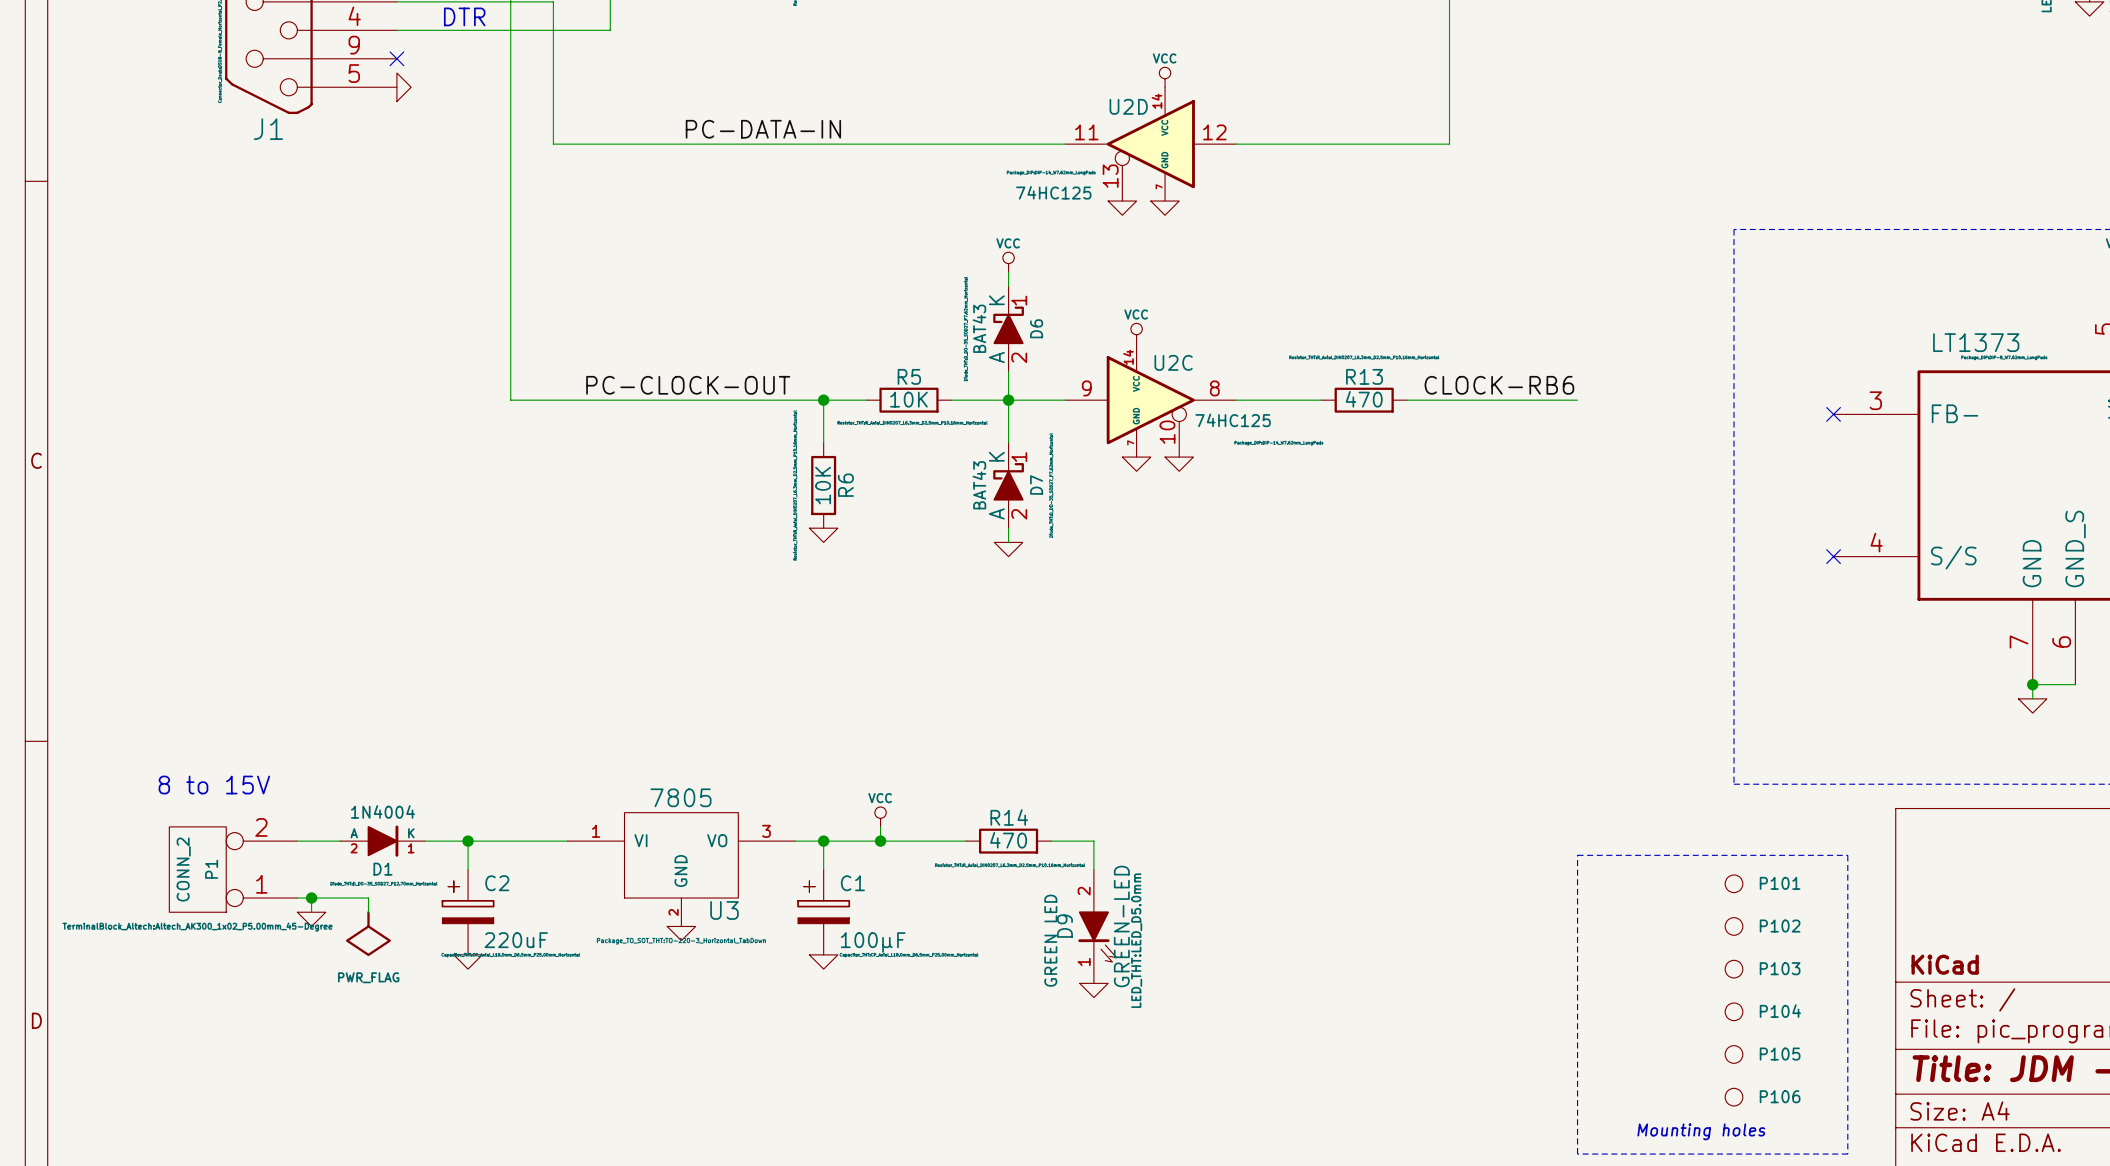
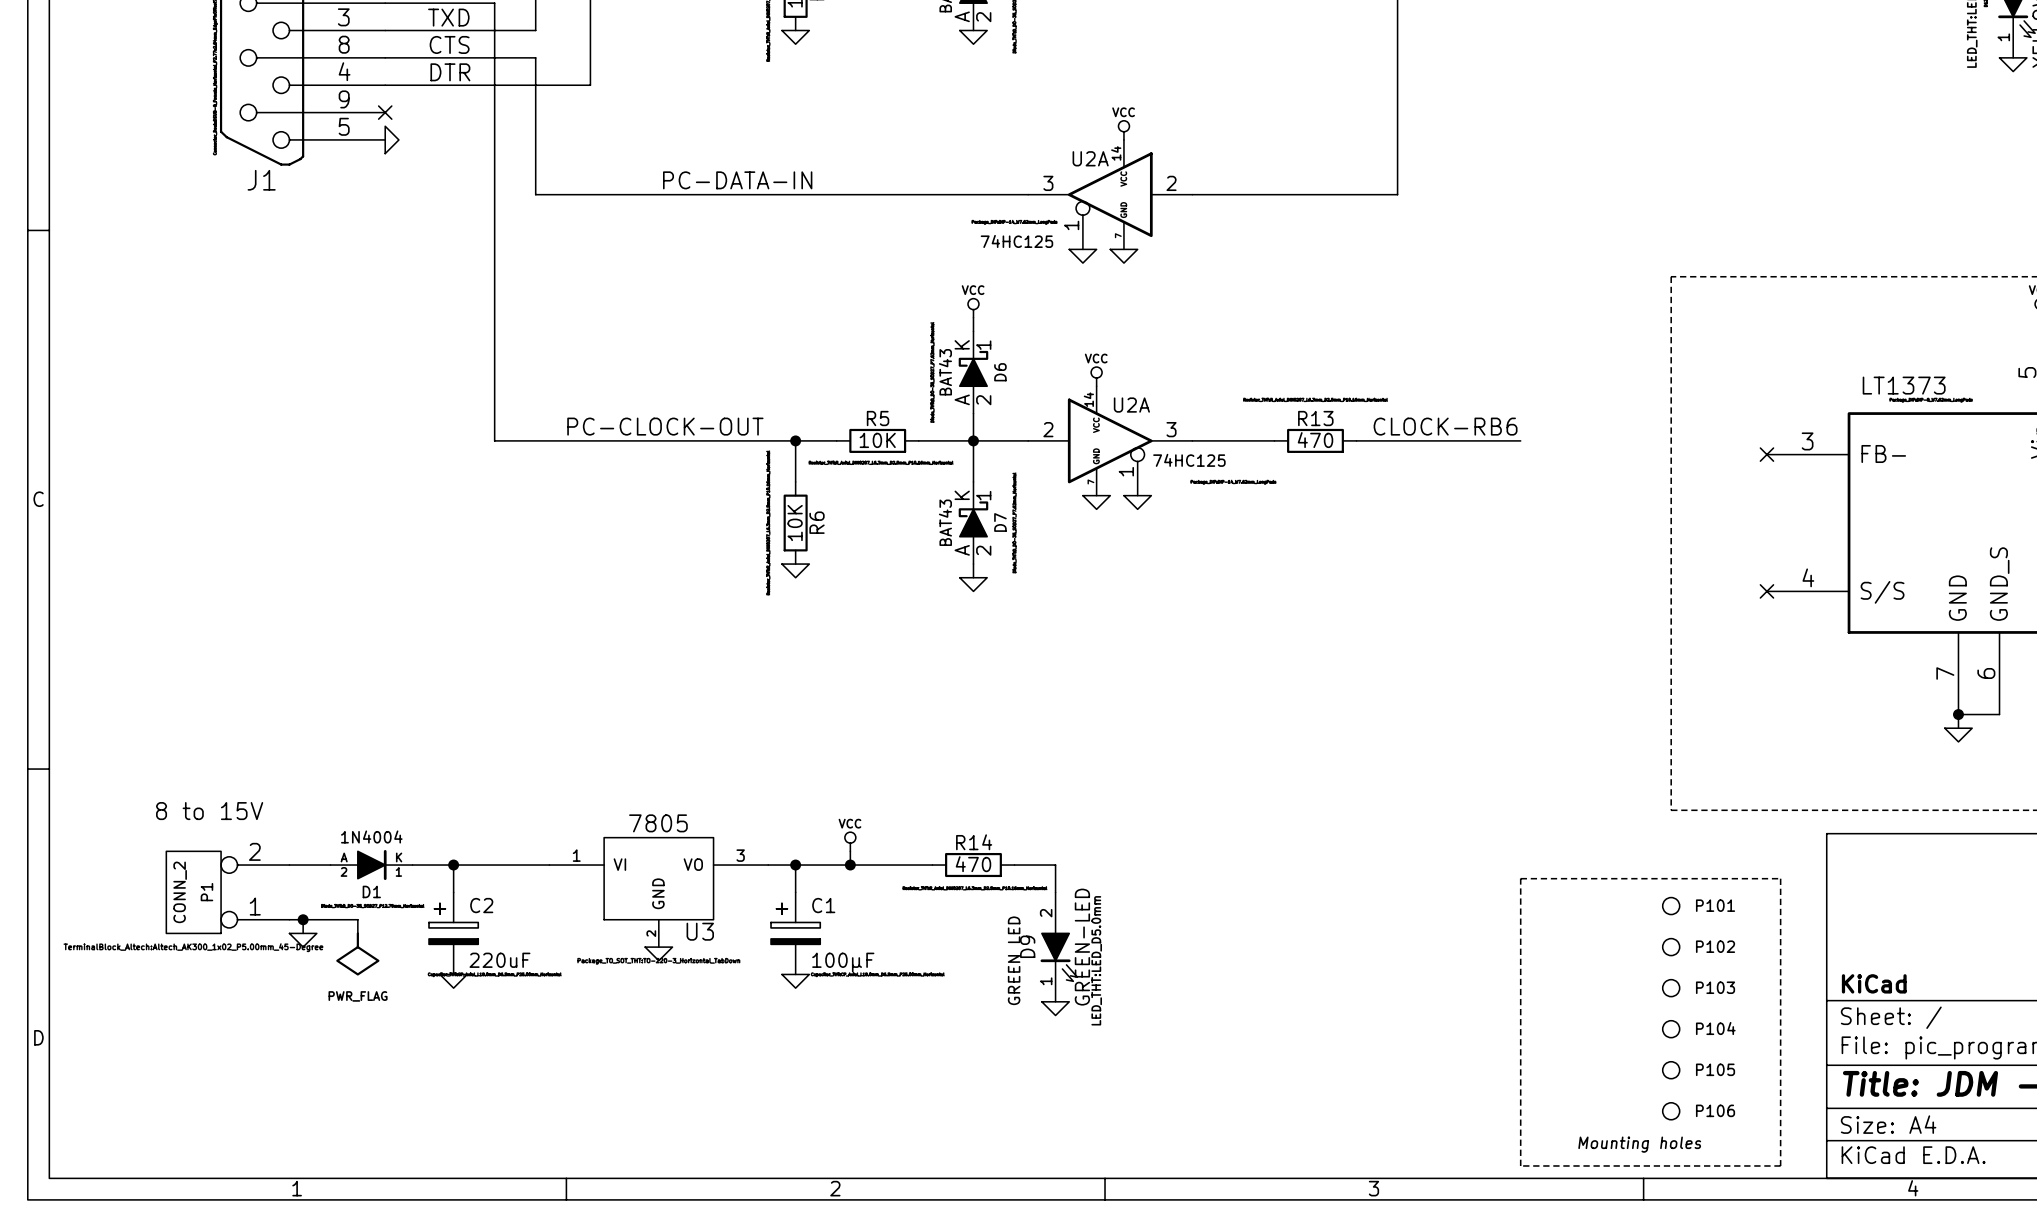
U2D name: U2D (1128, 106) -> U2A (1090, 158)
U2D pin number: 11 (1086, 132) -> 3 (1048, 183)
U2D pin number: 12 (1214, 132) -> 2 (1171, 183)
U2D pin number: 13 (1110, 176) -> 1 (1071, 225)
U2C name: U2C (1173, 362) -> U2A (1131, 405)
U2C pin number: 9 (1086, 388) -> 2 (1048, 429)
U2C pin number: 8 (1214, 388) -> 3 (1171, 429)
U2C pin number: 10 (1167, 432) -> 1 (1126, 471)

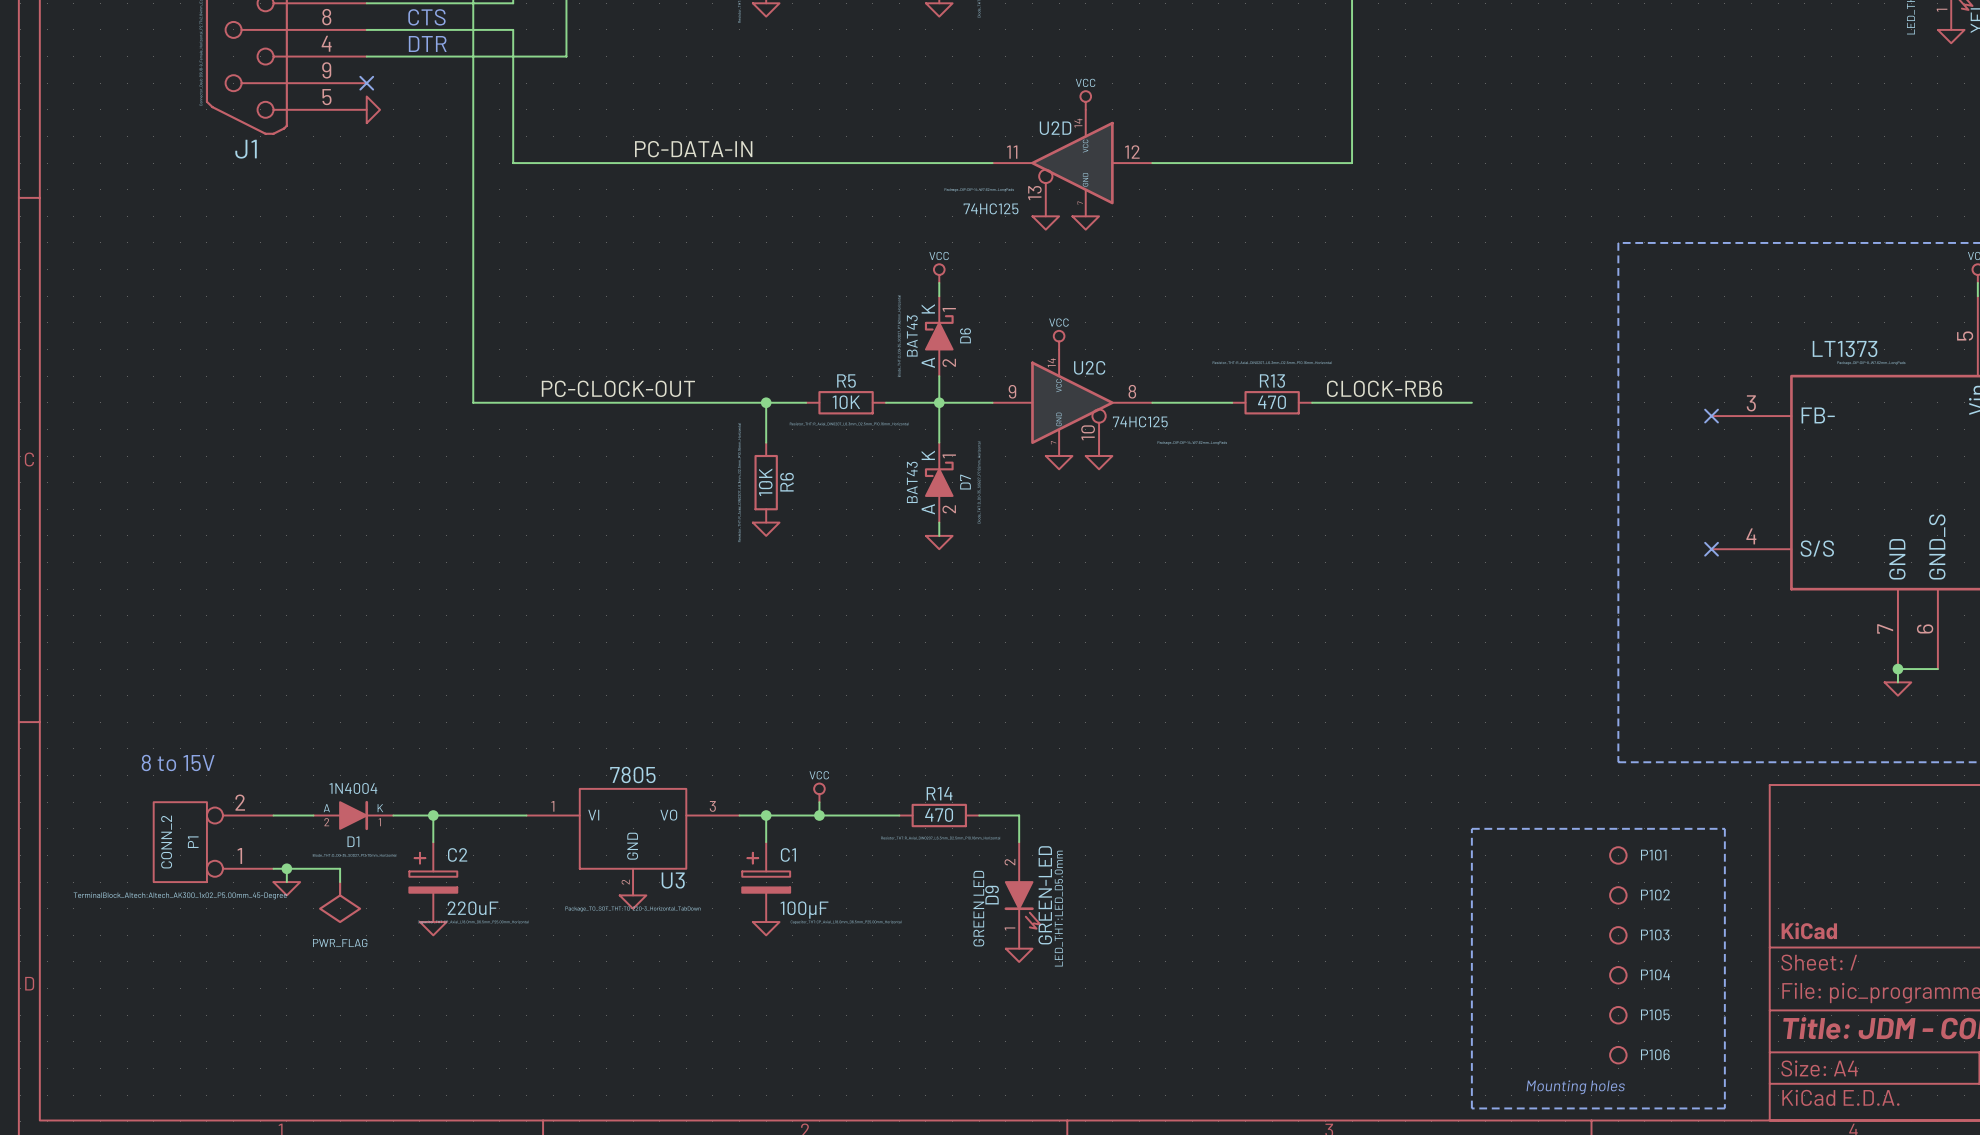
U2A name: U2A (1090, 158) -> U2D (1055, 128)
U2A pin number: 3 (1048, 183) -> 11 (1012, 152)
U2A pin number: 2 (1171, 183) -> 12 (1132, 152)
U2A pin number: 1 (1071, 225) -> 13 (1034, 193)
U2A name: U2A (1131, 405) -> U2C (1089, 367)
U2A pin number: 2 (1048, 429) -> 9 (1012, 391)
U2A pin number: 3 (1171, 429) -> 8 (1132, 391)
U2A pin number: 1 (1126, 471) -> 10 (1088, 432)

